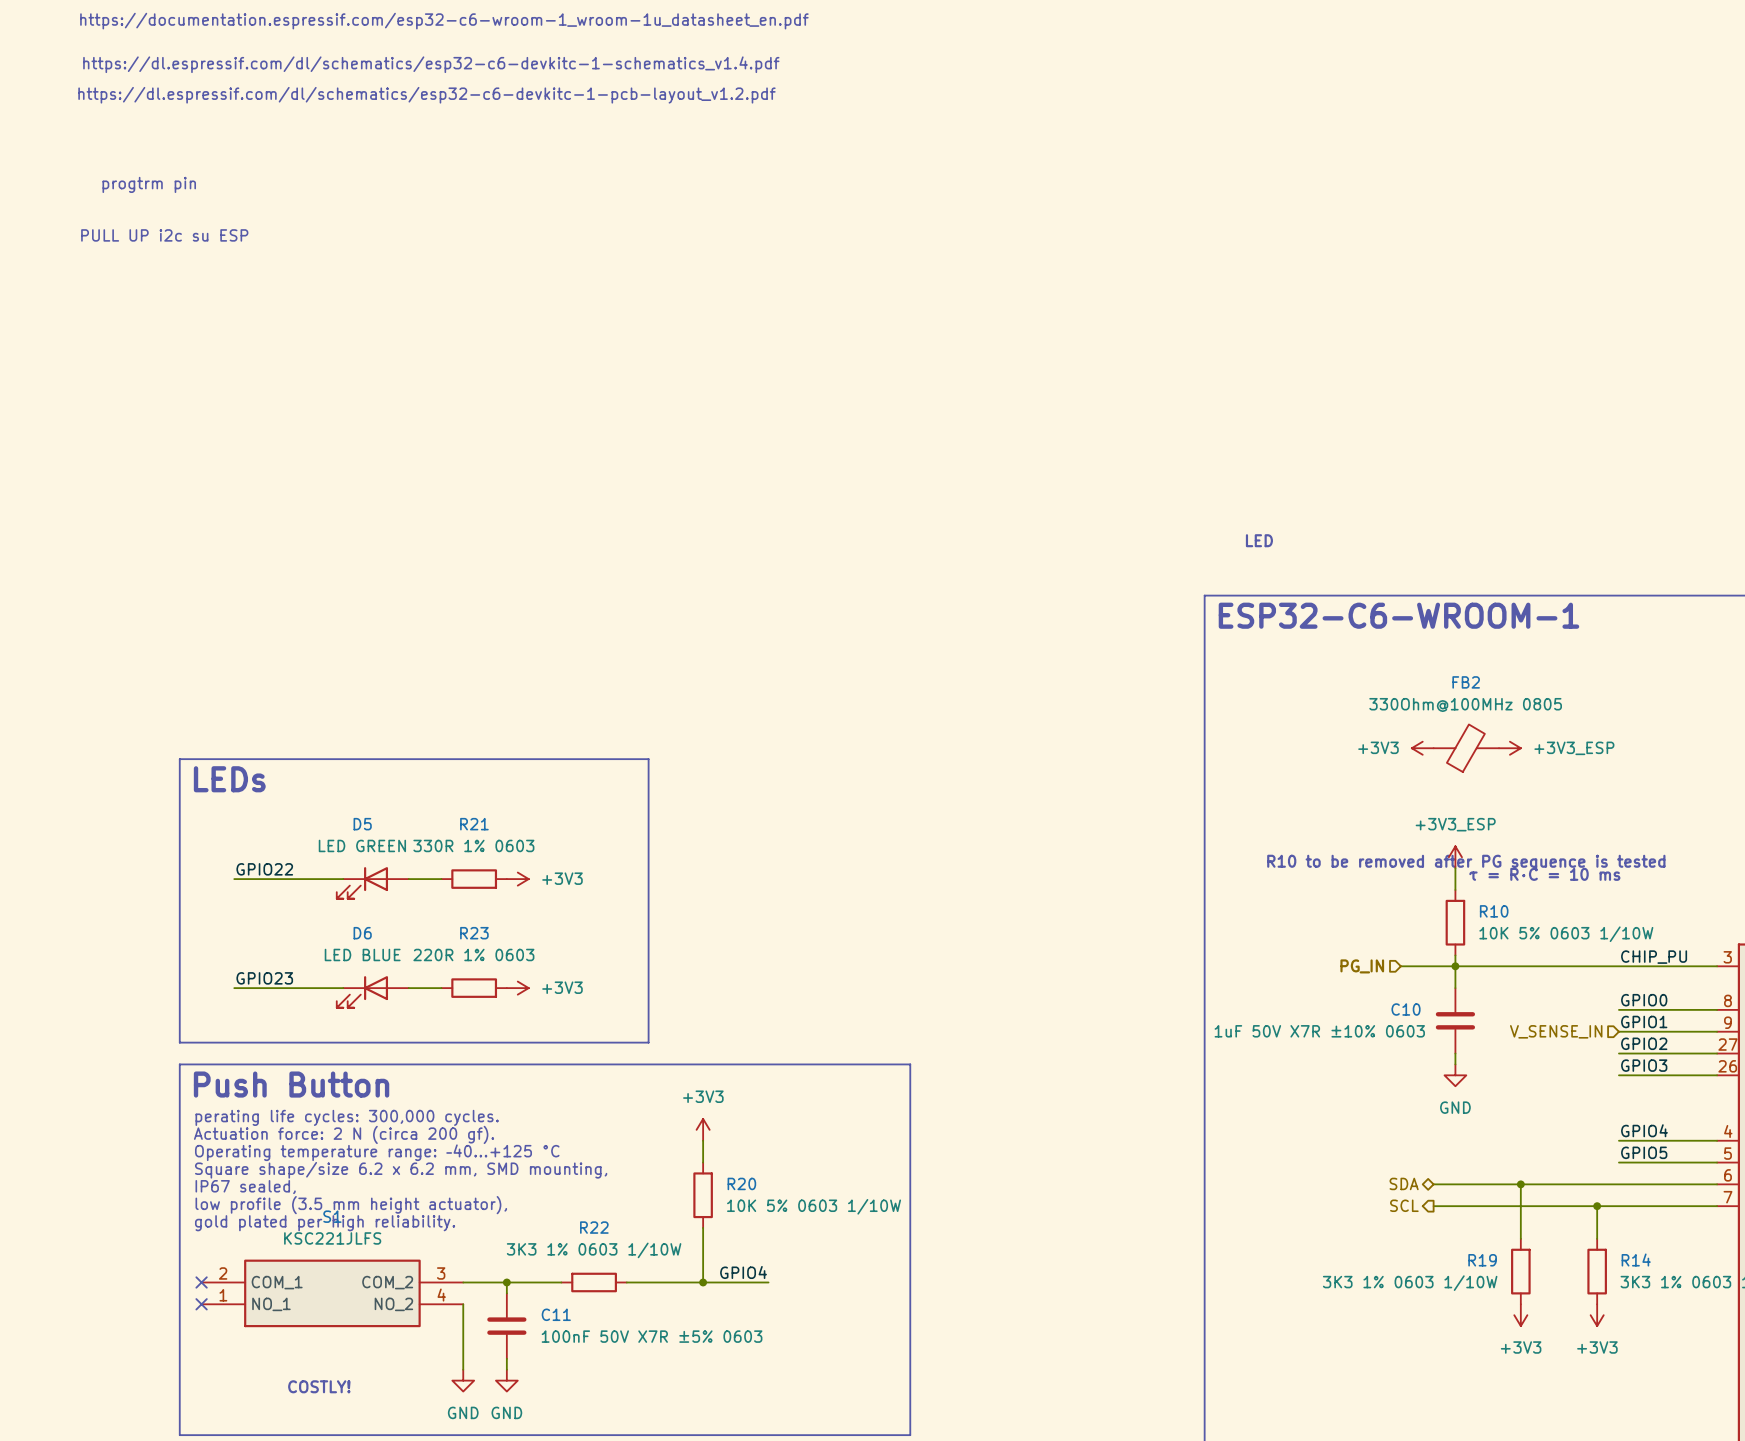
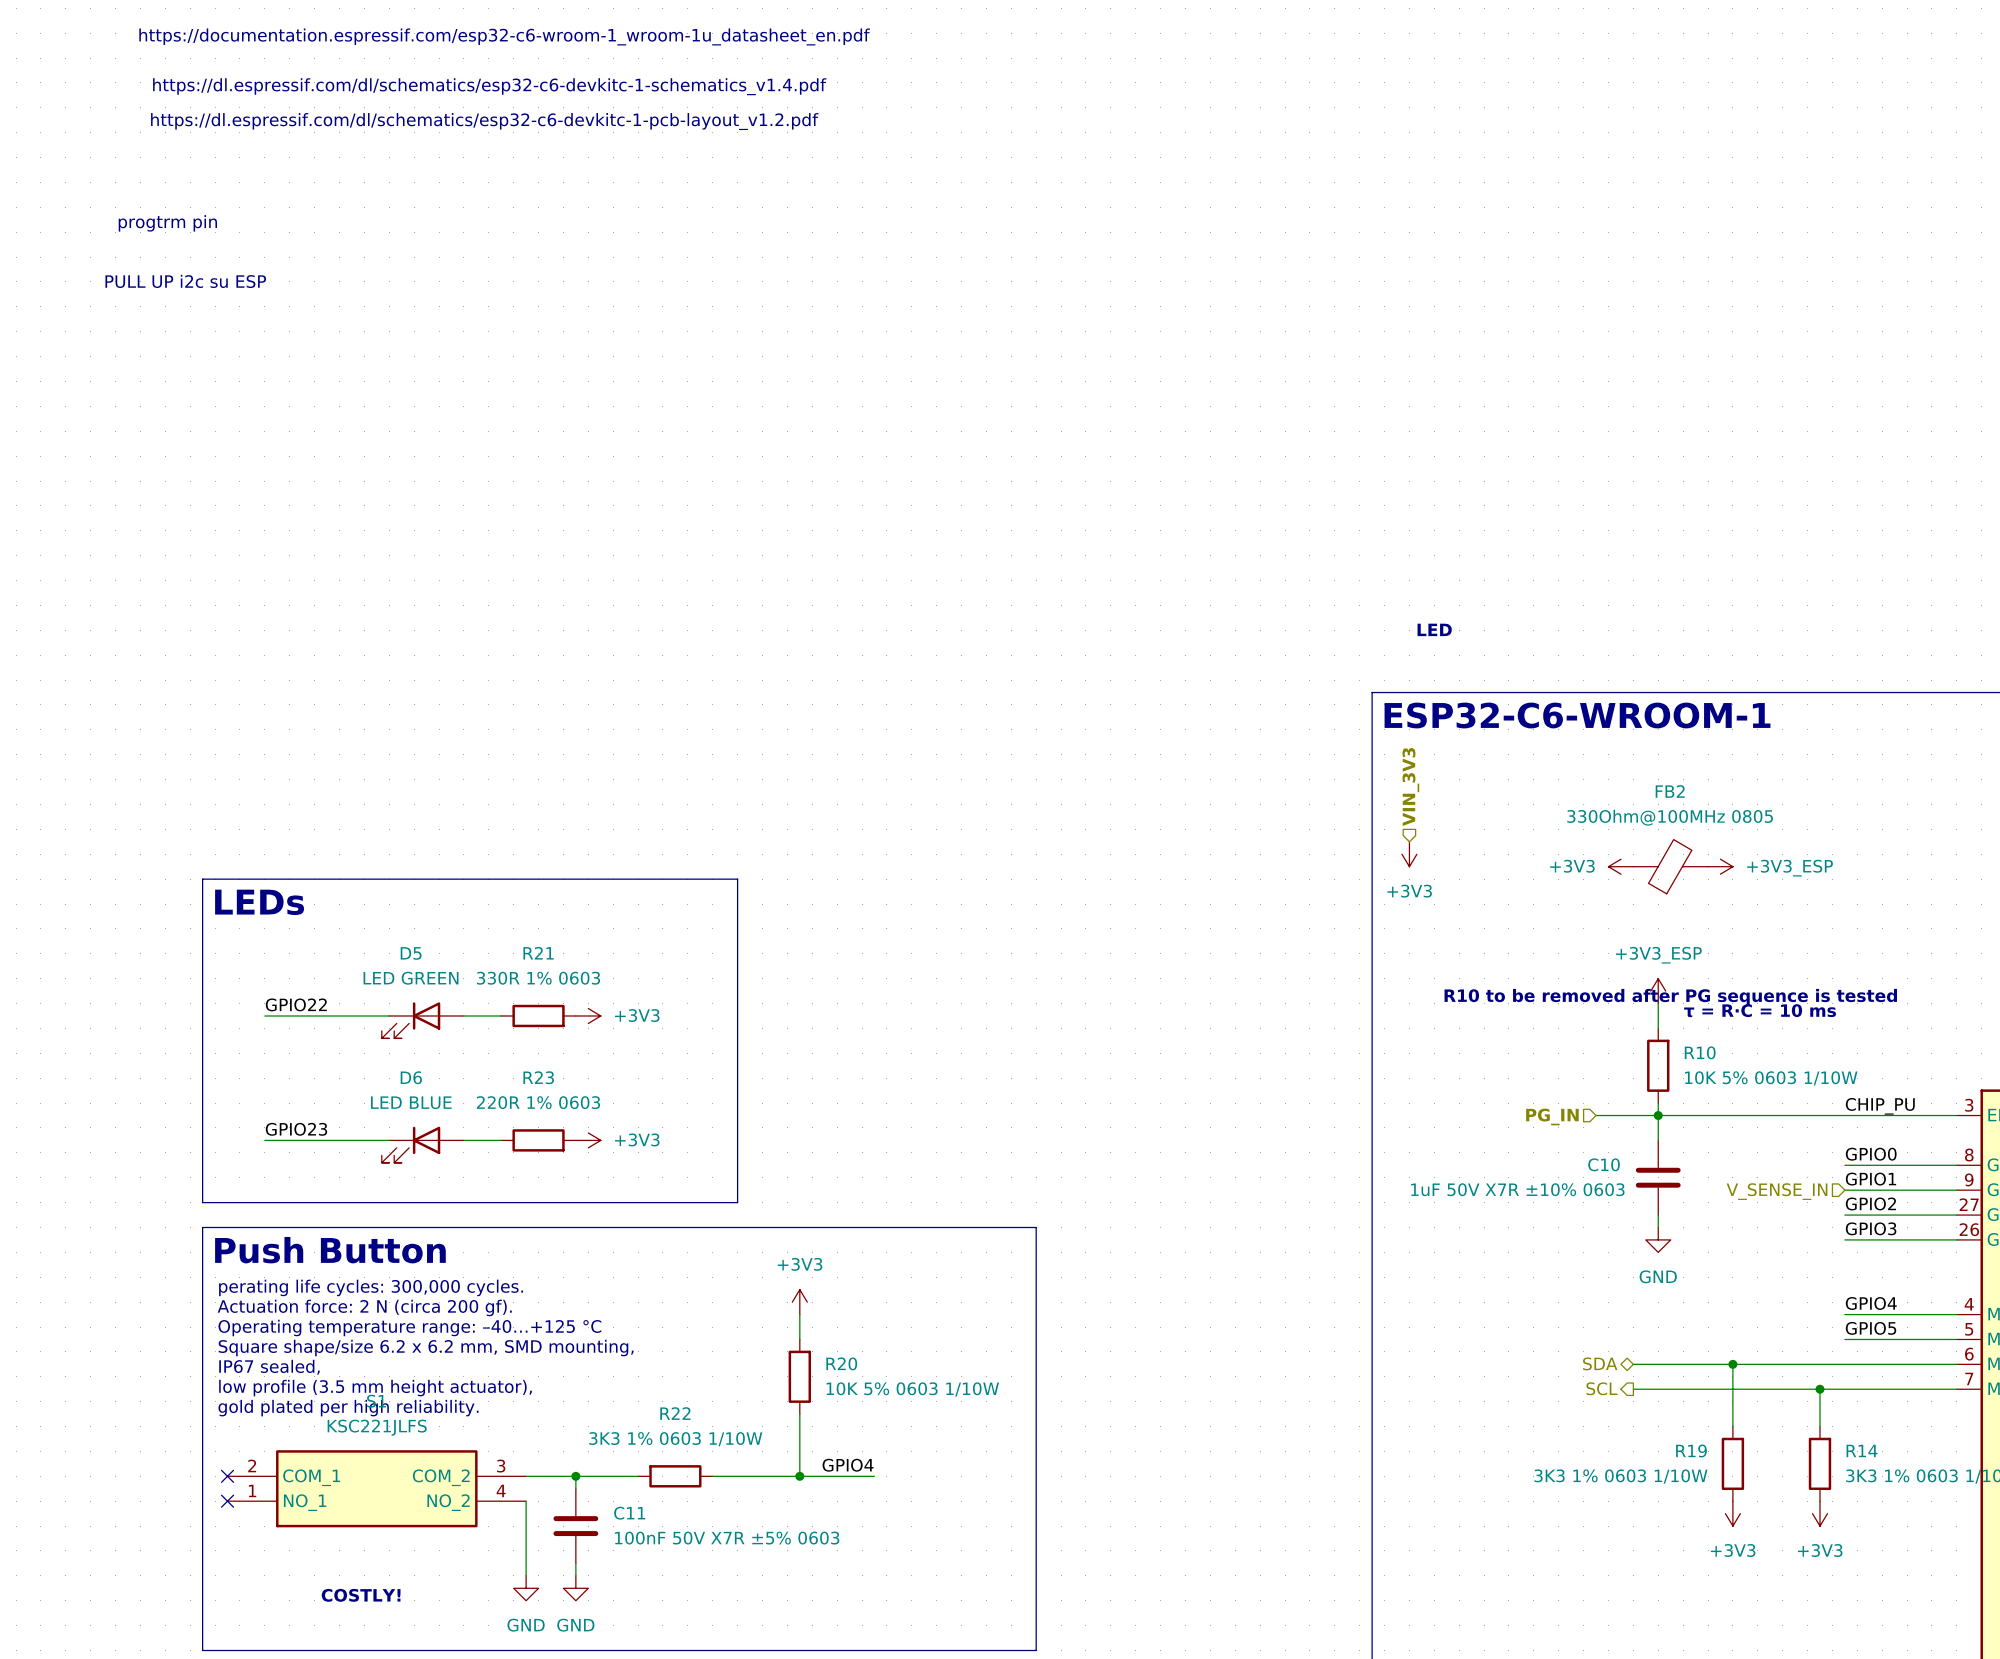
hierarchical label: none -> VIN_3V3 (1410, 786)
power symbol: none -> +3V3 (1409, 854)

